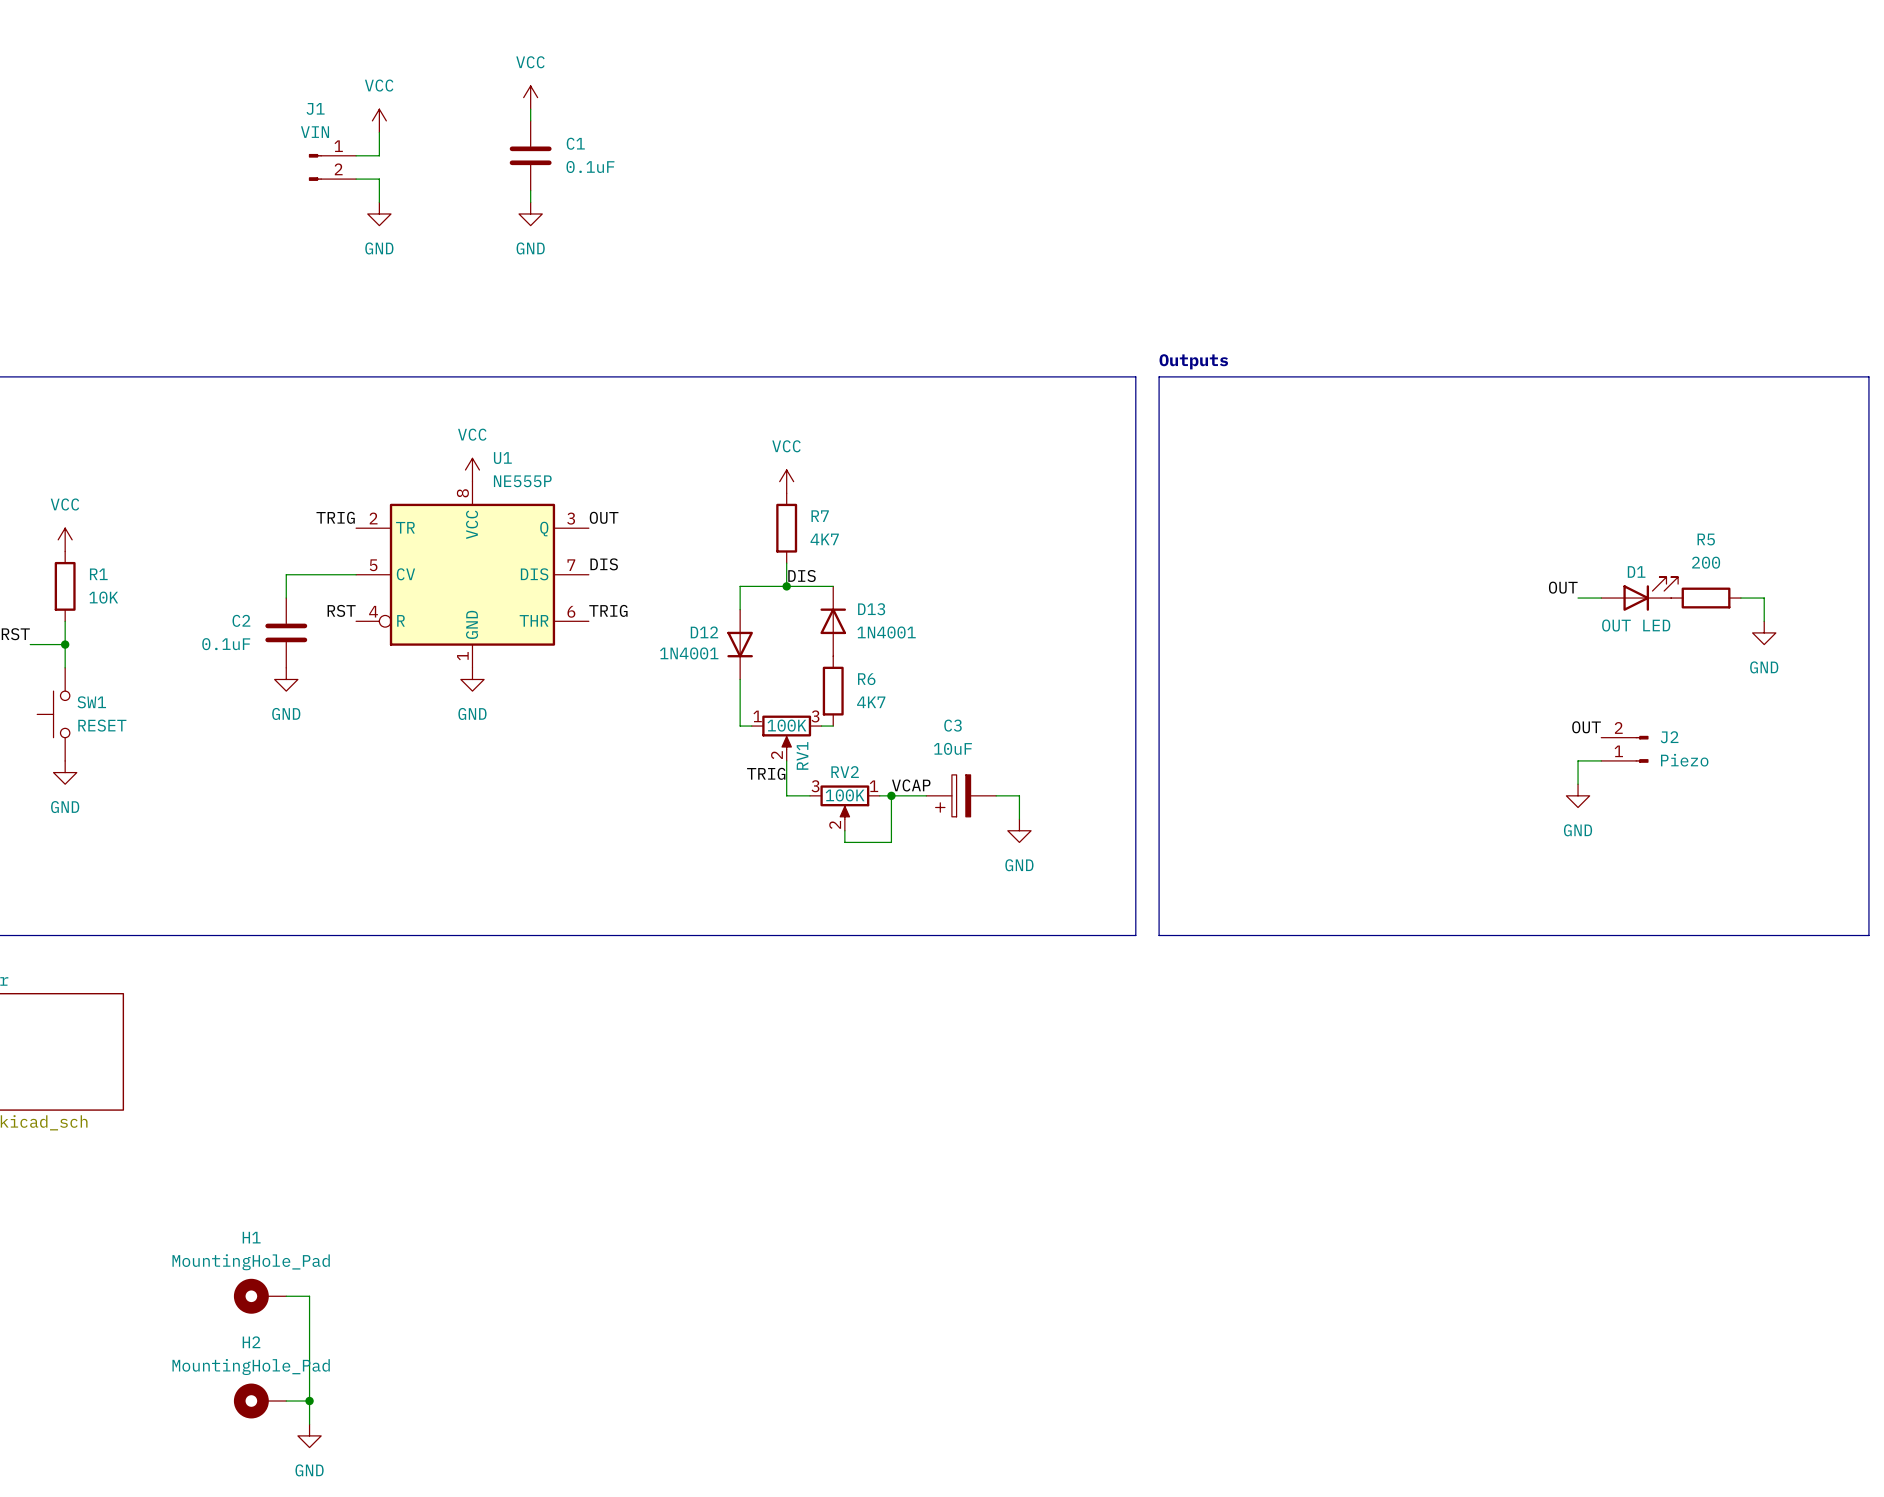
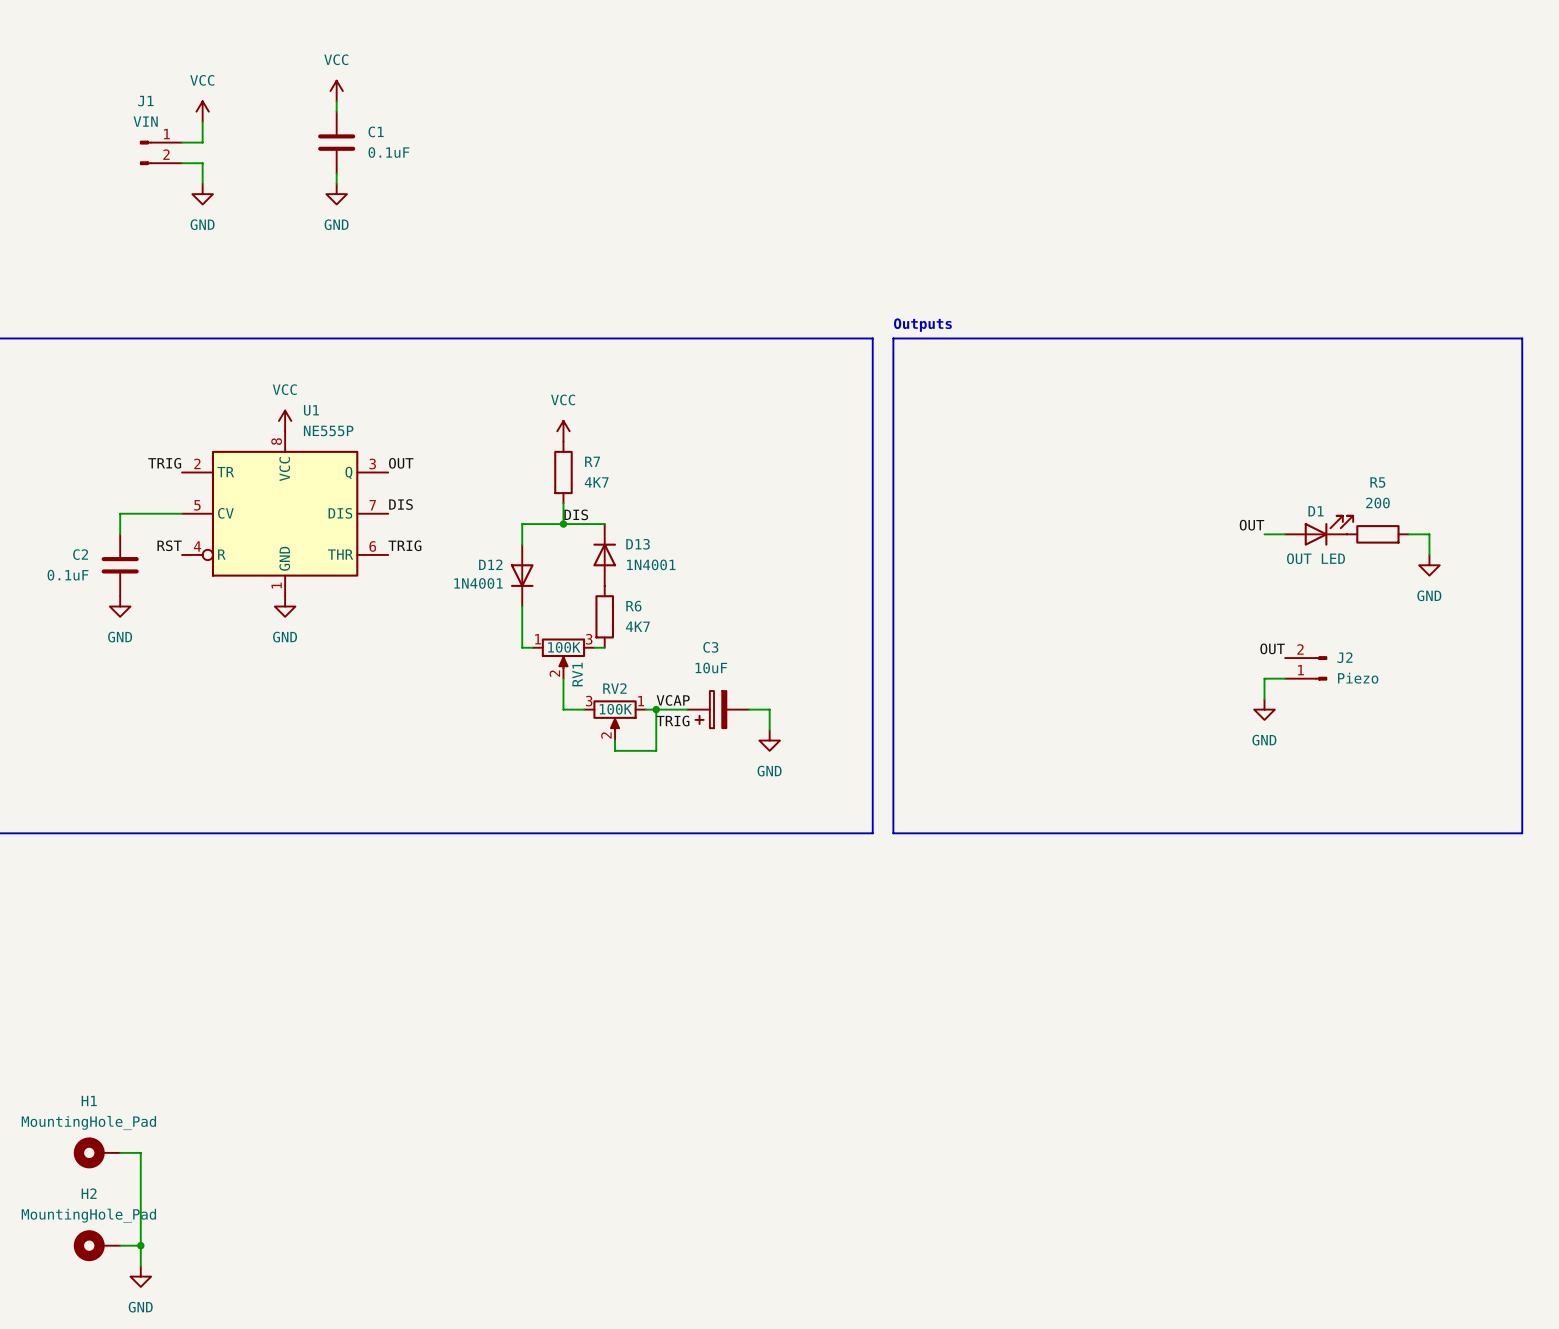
label position: TRIG (766, 773) -> TRIG (673, 721)

